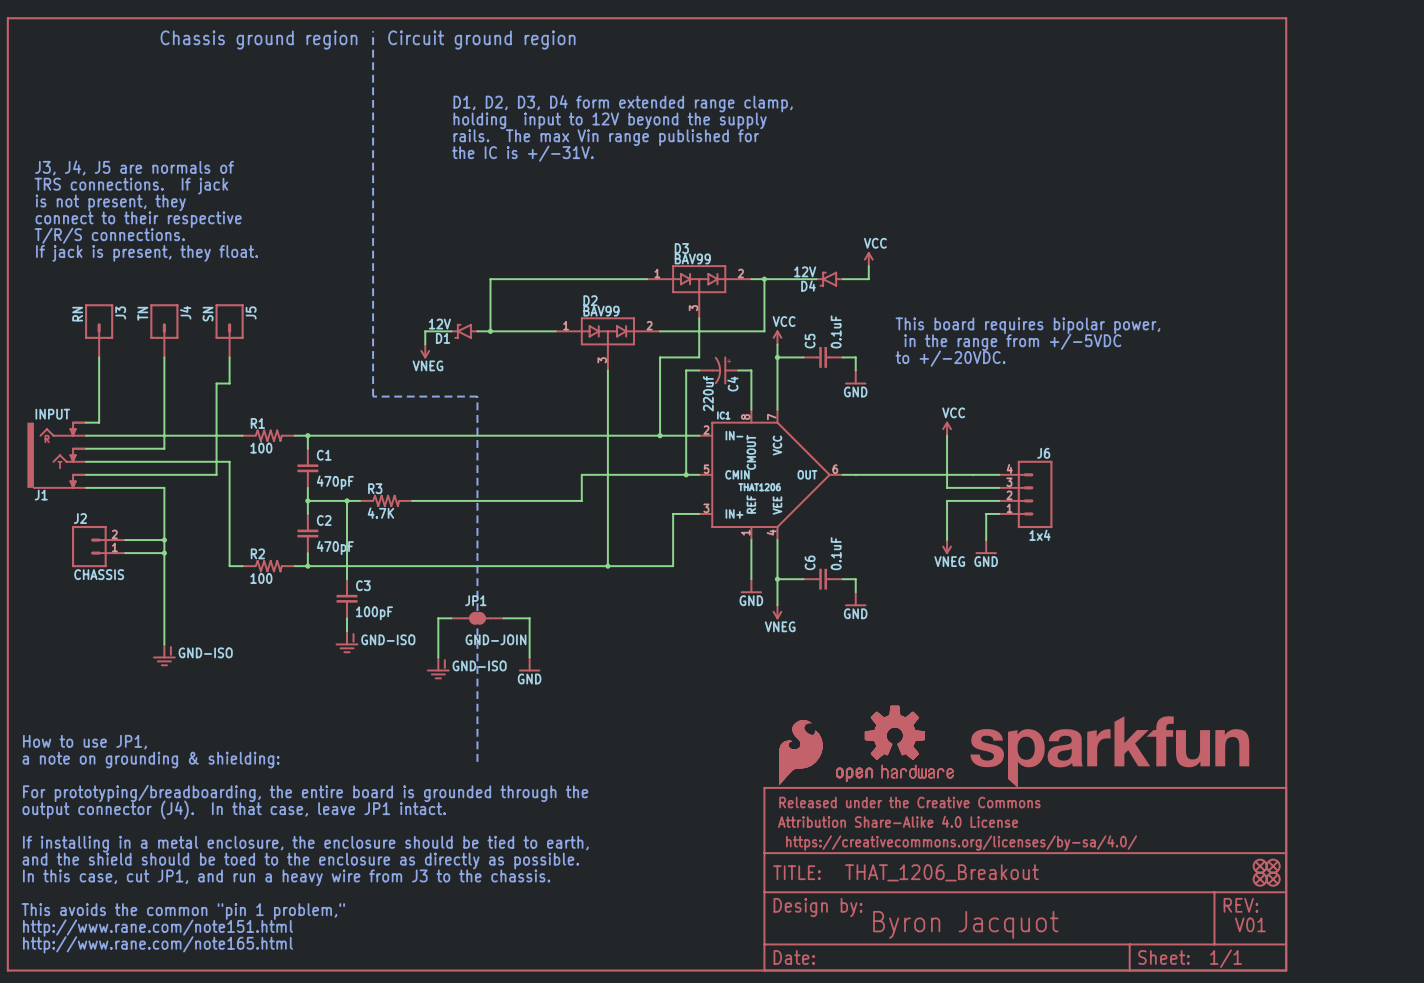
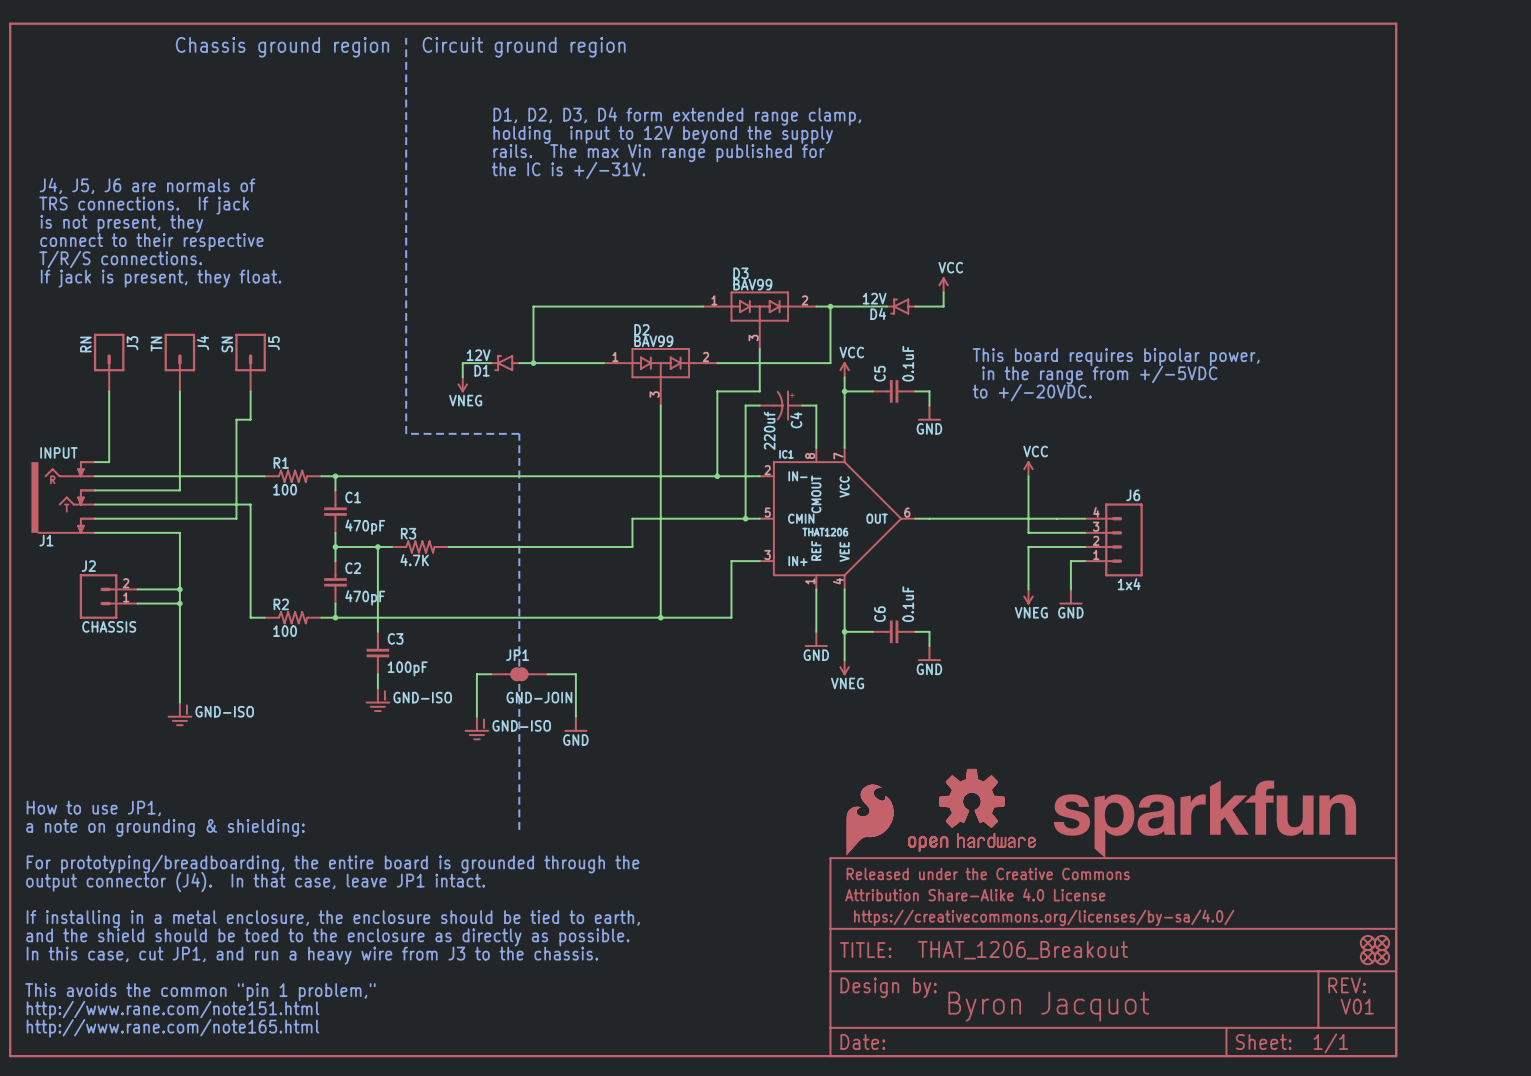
text: J3, J4, J5 are normals of (134, 167) -> J4, J5, J6 are normals of (147, 185)

